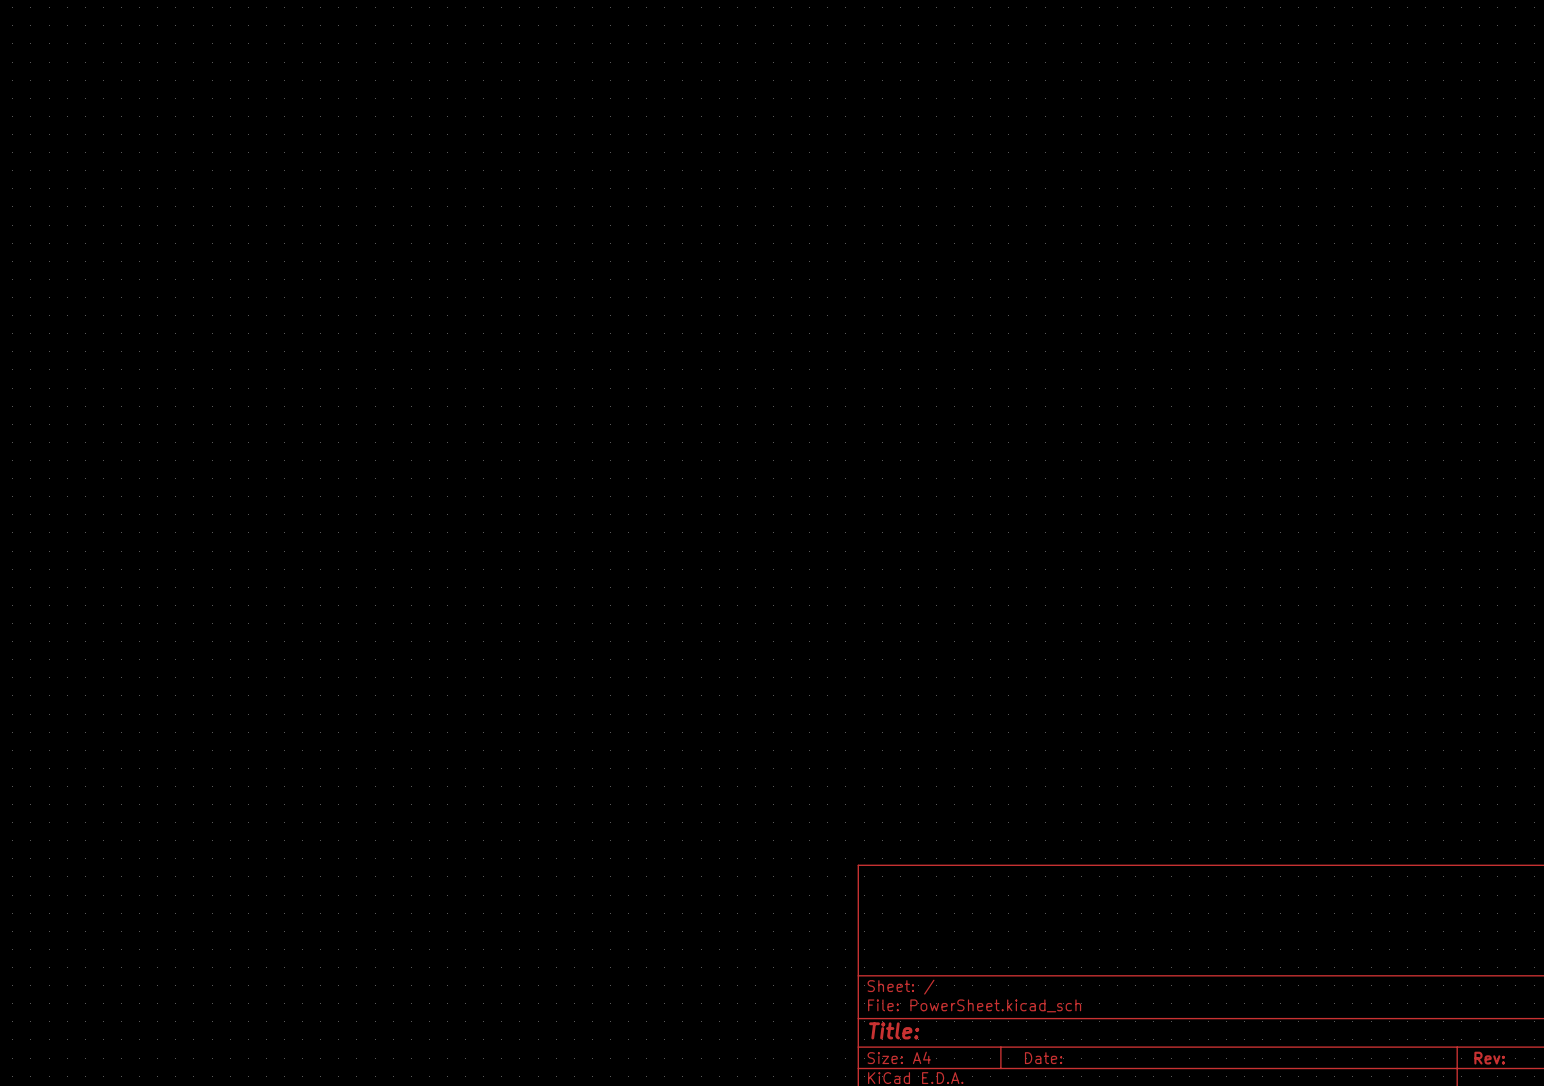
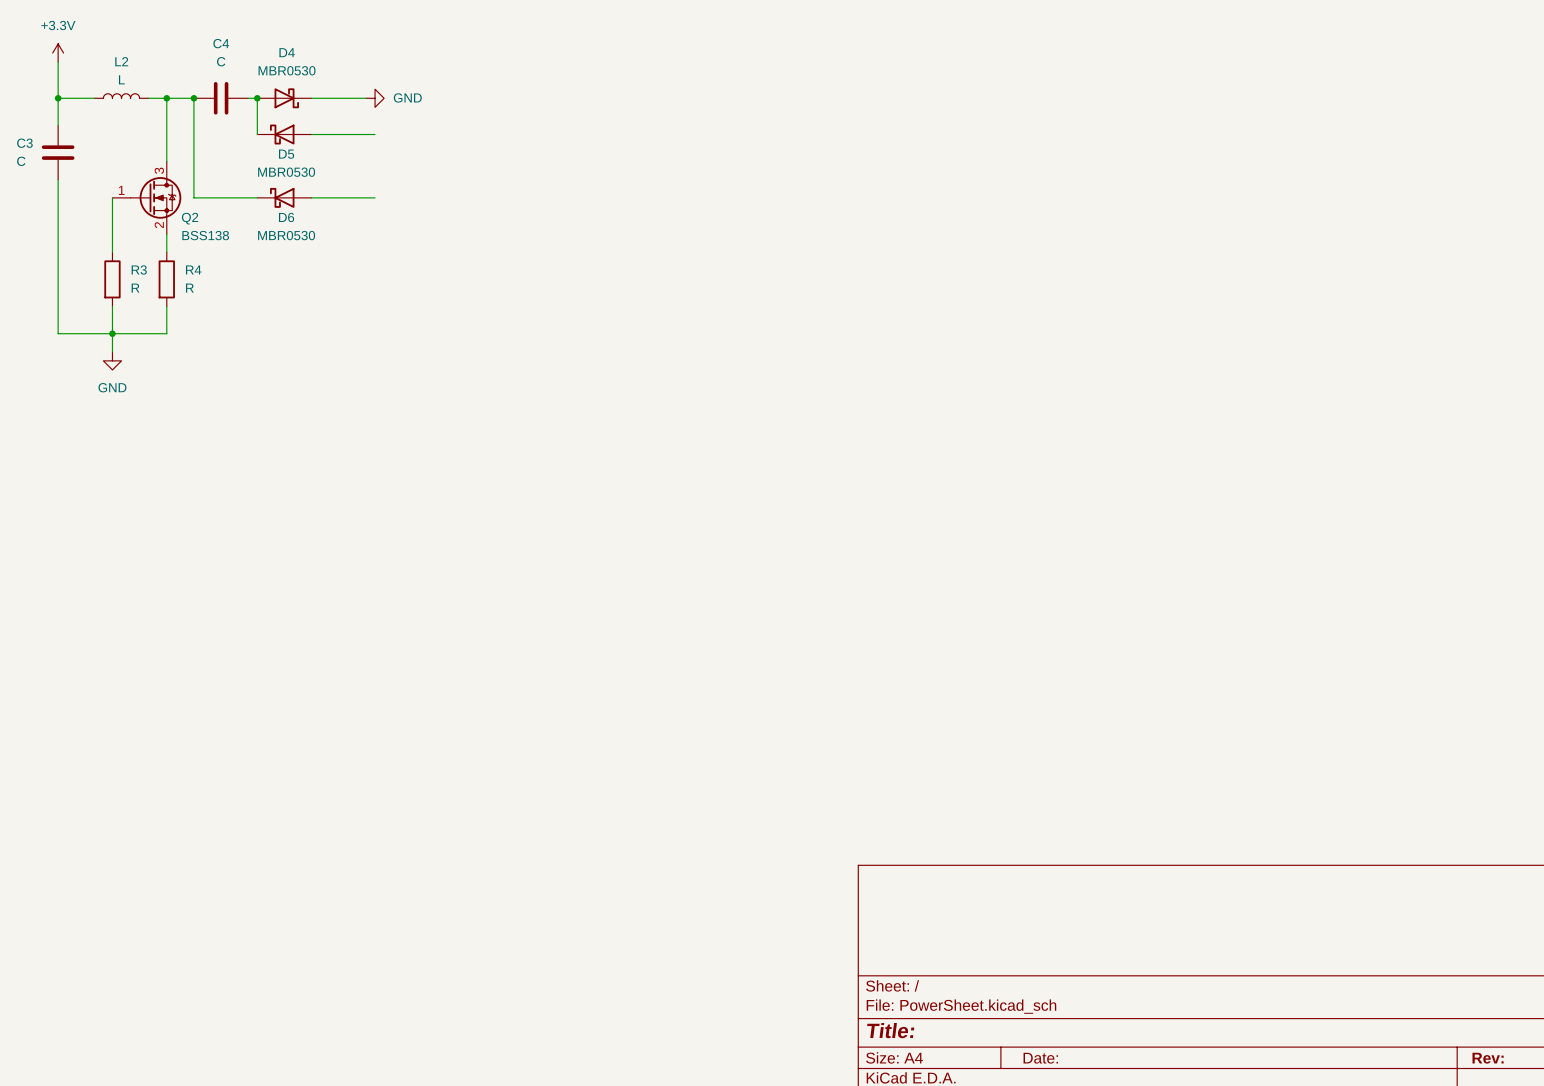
power symbol: none -> +3.3V (58, 53)
wire: none -> (58, 62) (58, 125)
L2: none -> L (121, 96)
wire: none -> (58, 98) (94, 98)
junction: none -> (58, 98)
wire: none -> (148, 98) (193, 98) (193, 197) (257, 197)
wire: none -> (166, 98) (166, 161)
junction: none -> (166, 98)
junction: none -> (193, 98)
C4: none -> C (221, 98)
wire: none -> (248, 98) (257, 98) (257, 134)
junction: none -> (257, 98)
D4: none -> MBR0530 (284, 98)
wire: none -> (311, 98) (365, 98)
power symbol: none -> GND (375, 98)
D5: none -> MBR0530 (284, 134)
wire: none -> (311, 134) (375, 134)
C3: none -> C (58, 152)
wire: none -> (58, 179) (58, 333) (166, 333) (166, 306)
wire: none -> (112, 197) (112, 252)
Q2: none -> BSS138 (146, 197)
D6: none -> MBR0530 (284, 197)
wire: none -> (311, 197) (375, 197)
wire: none -> (166, 234) (166, 252)
R3: none -> R (112, 279)
R4: none -> R (166, 279)
wire: none -> (112, 306) (112, 351)
junction: none -> (112, 333)
power symbol: none -> GND (112, 360)

